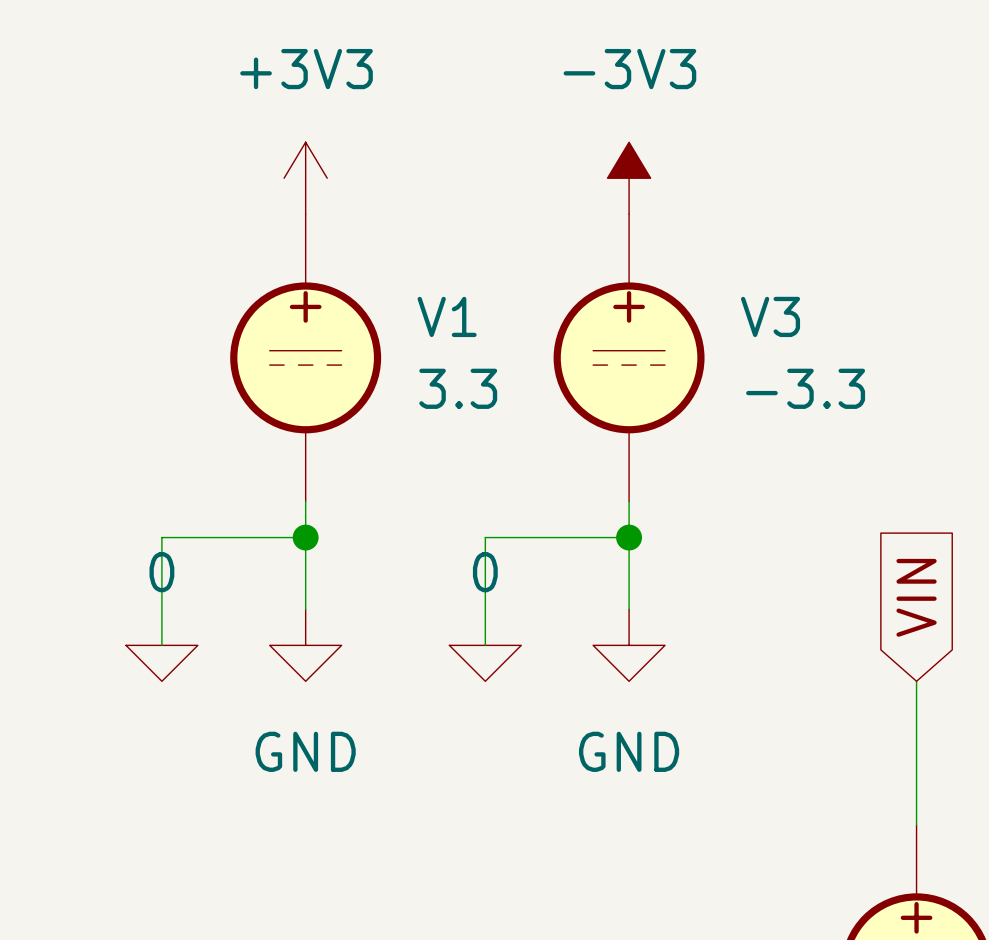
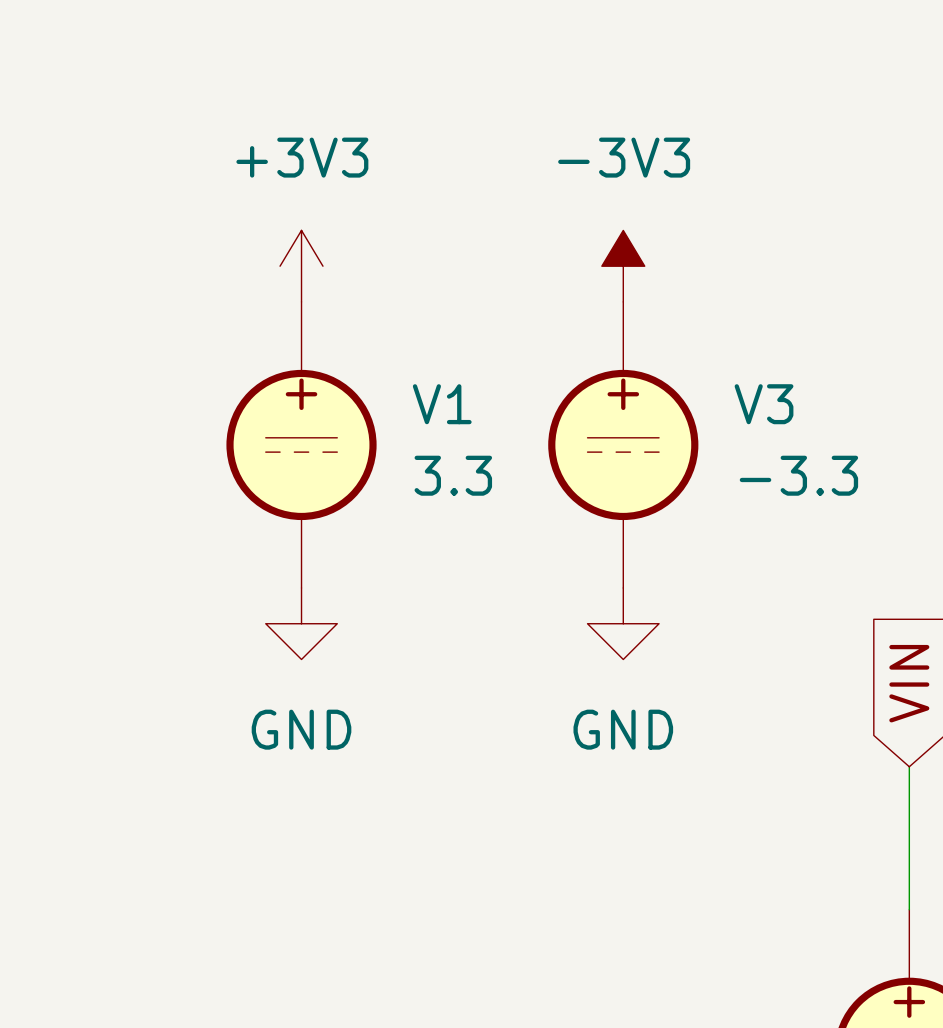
wire: (305, 501) (305, 609) -> none
wire: (629, 501) (629, 609) -> none
wire: (305, 537) (161, 537) (161, 645) -> none
junction: (305, 537) -> none
wire: (629, 537) (485, 537) (485, 645) -> none
junction: (629, 537) -> none
power symbol position: GND (305, 645) -> GND (301, 623)
power symbol position: GND (629, 645) -> GND (623, 623)
power symbol: 0 (161, 663) -> none
power symbol: 0 (485, 663) -> none

